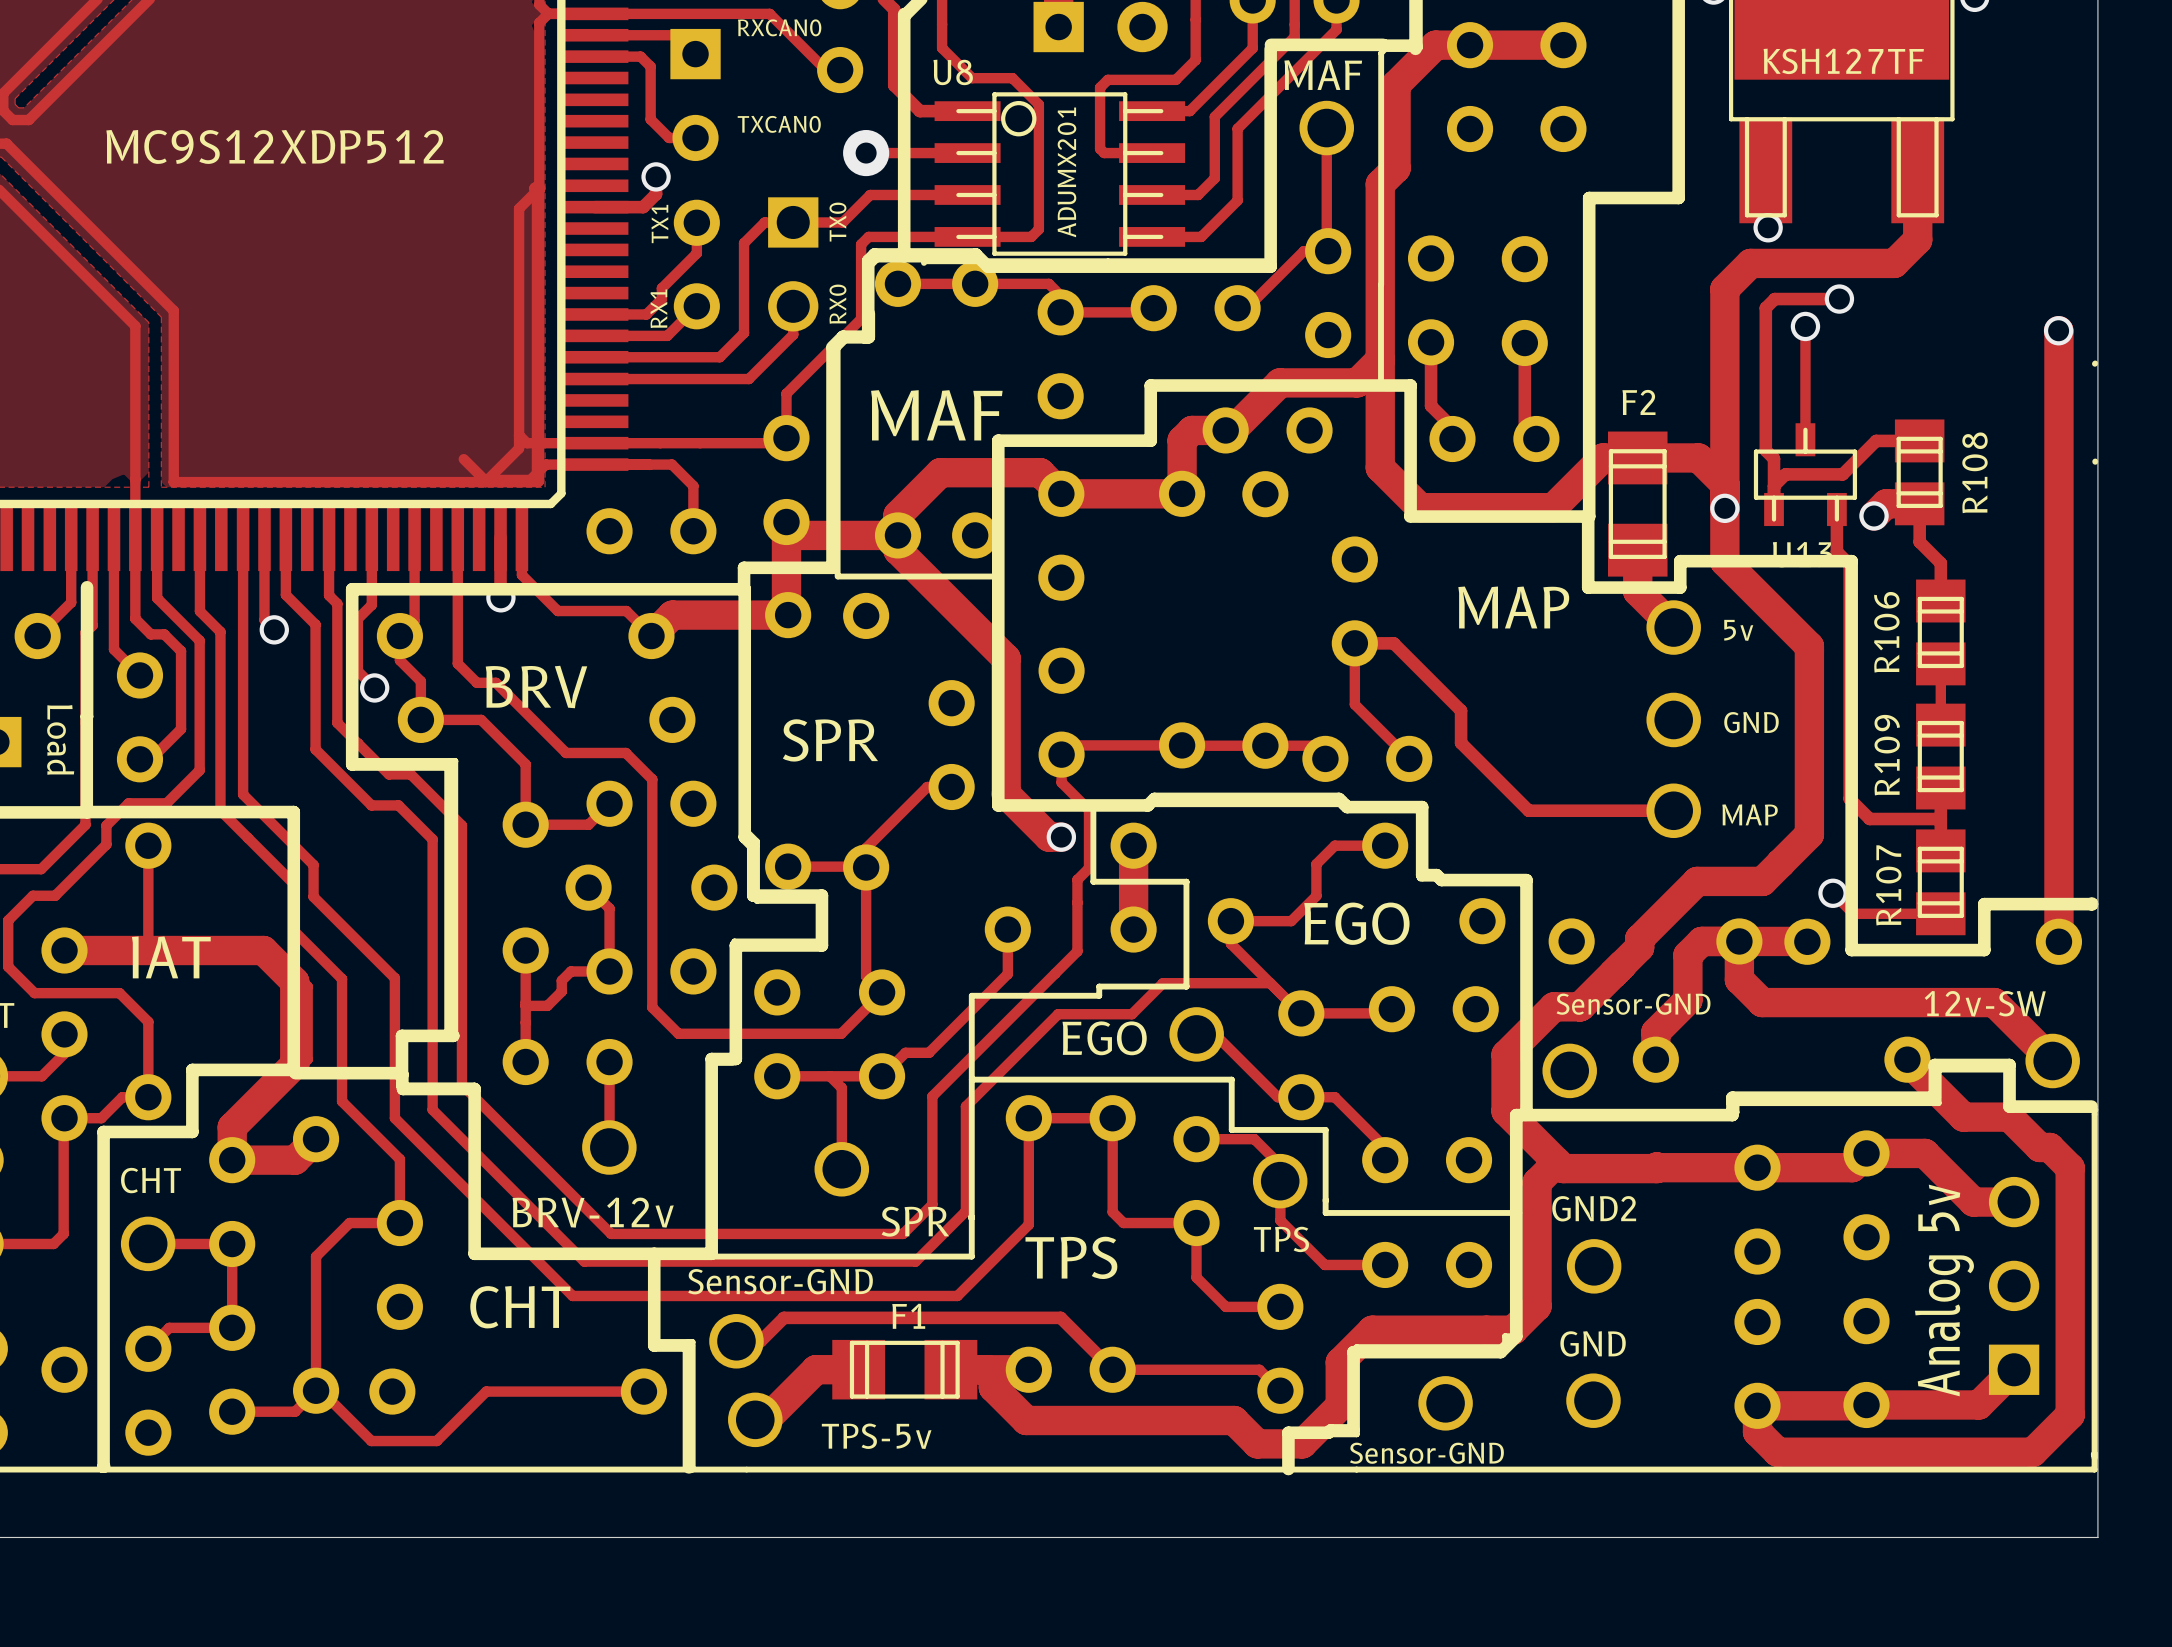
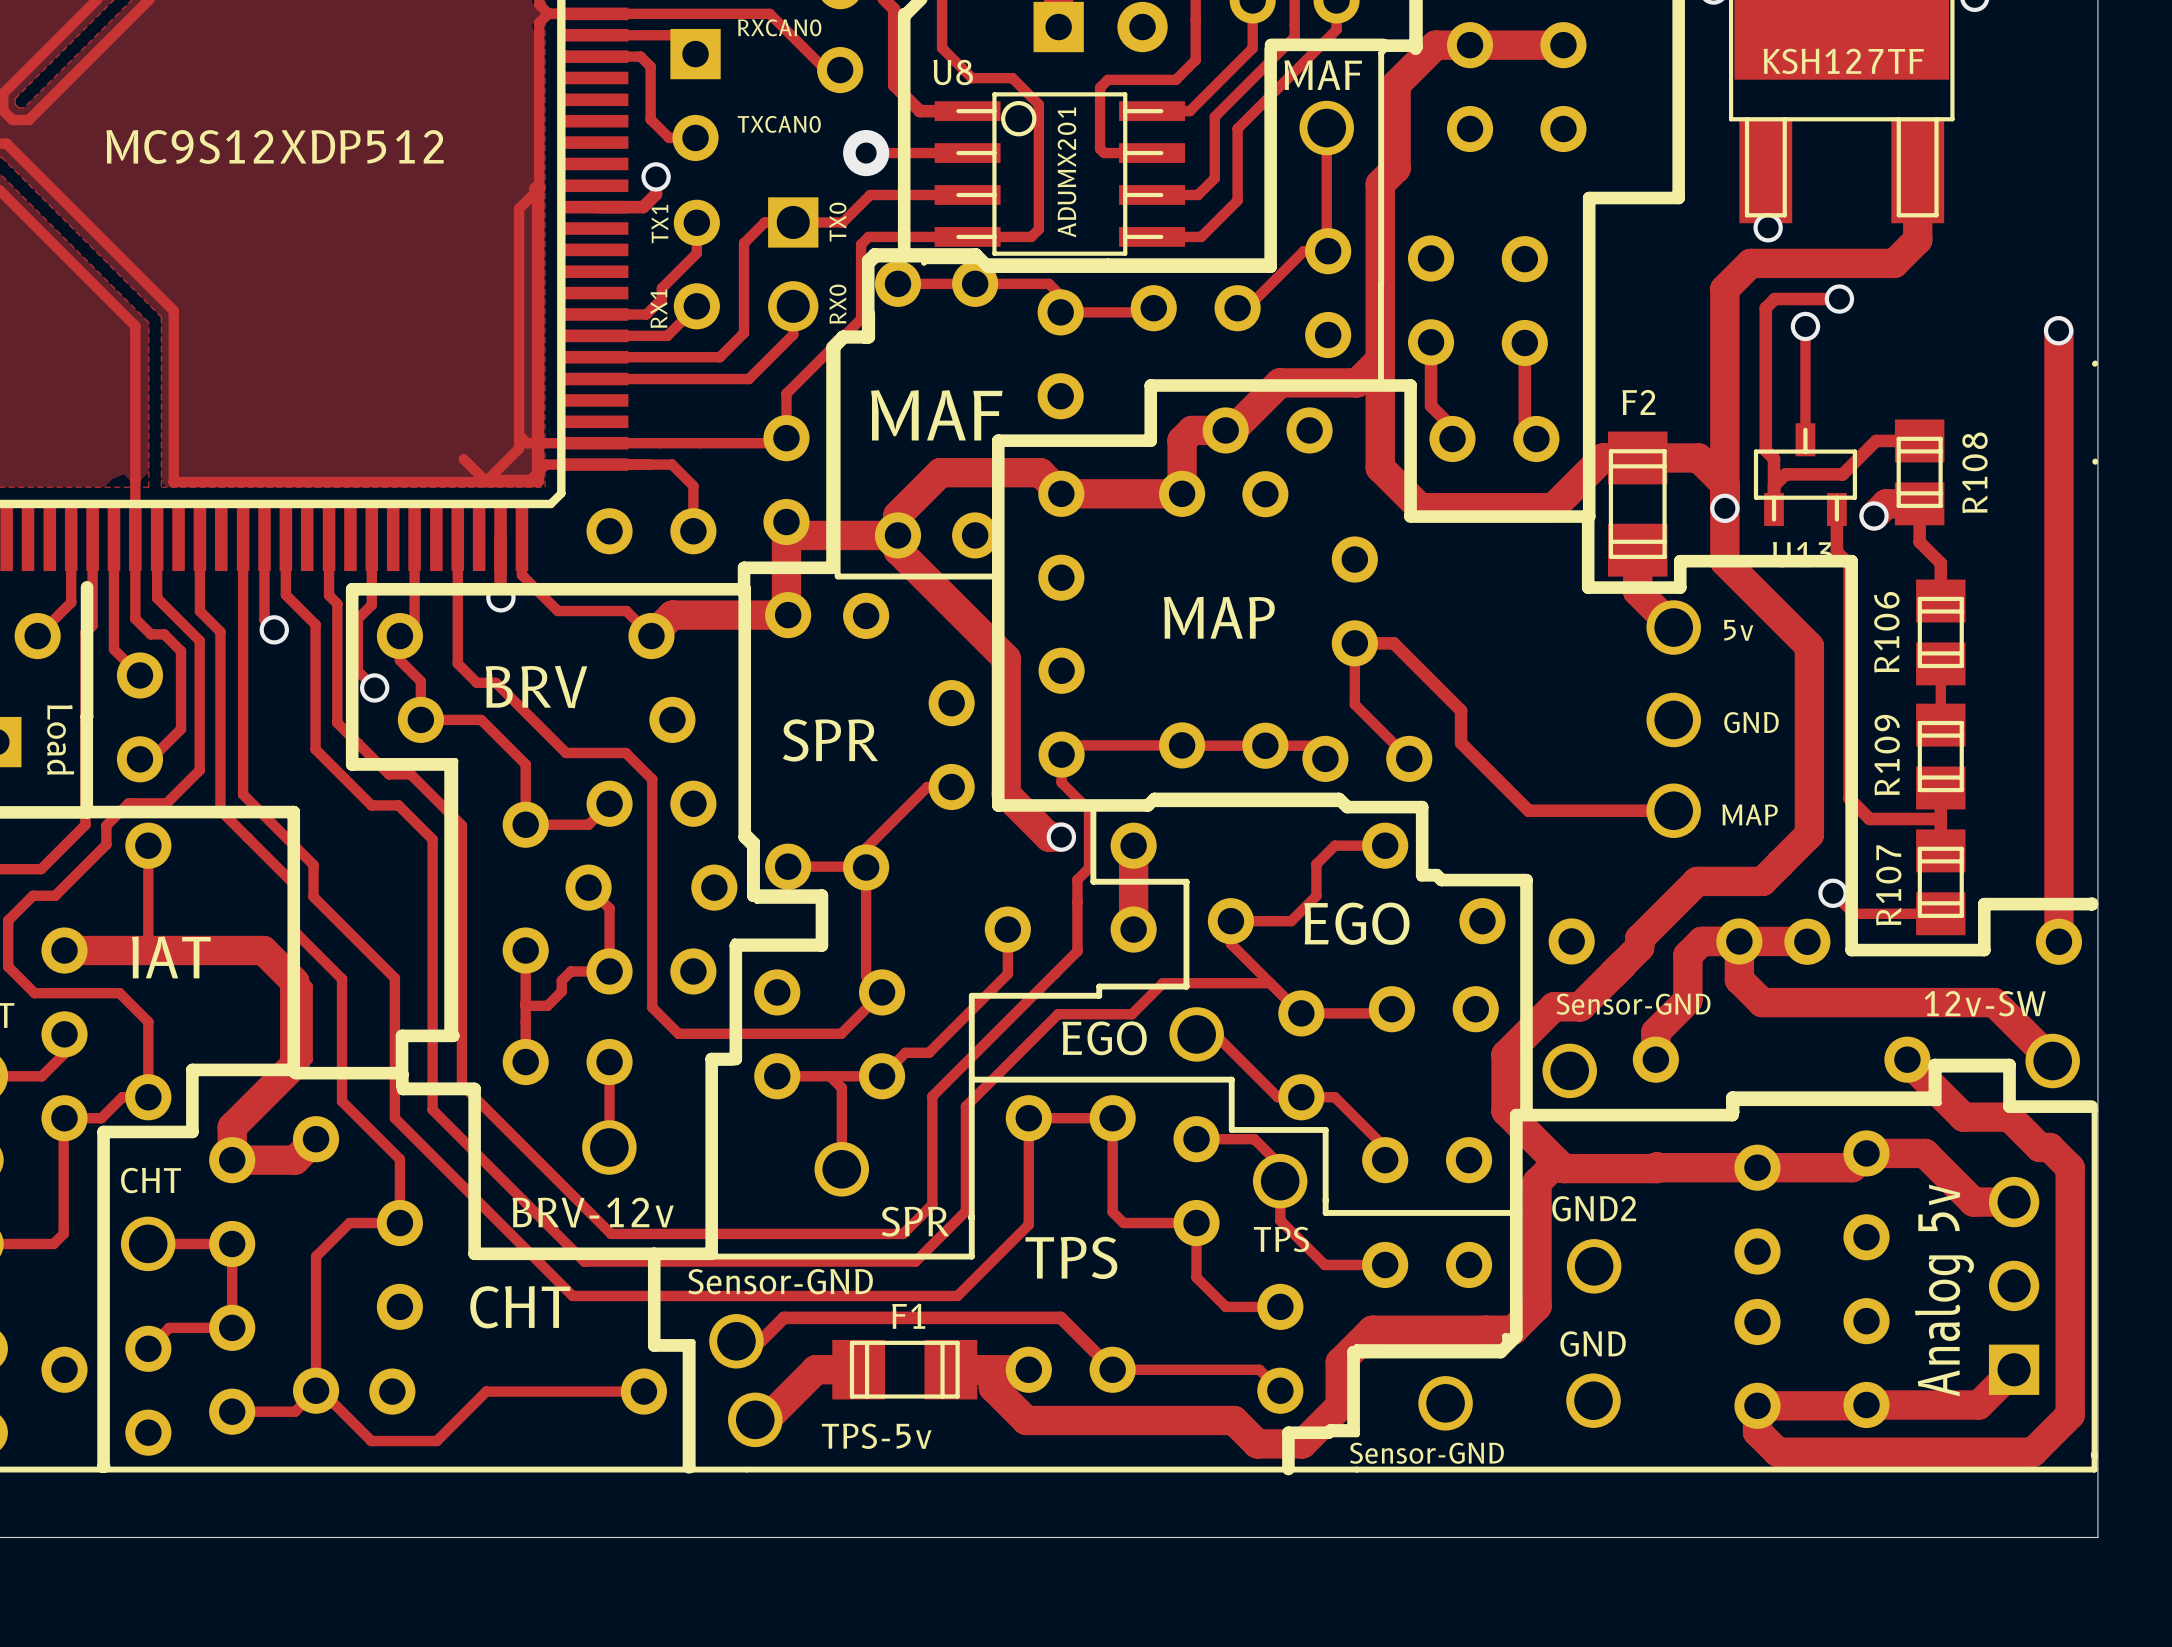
text position: MAP (1513, 607) -> MAP (1219, 617)

